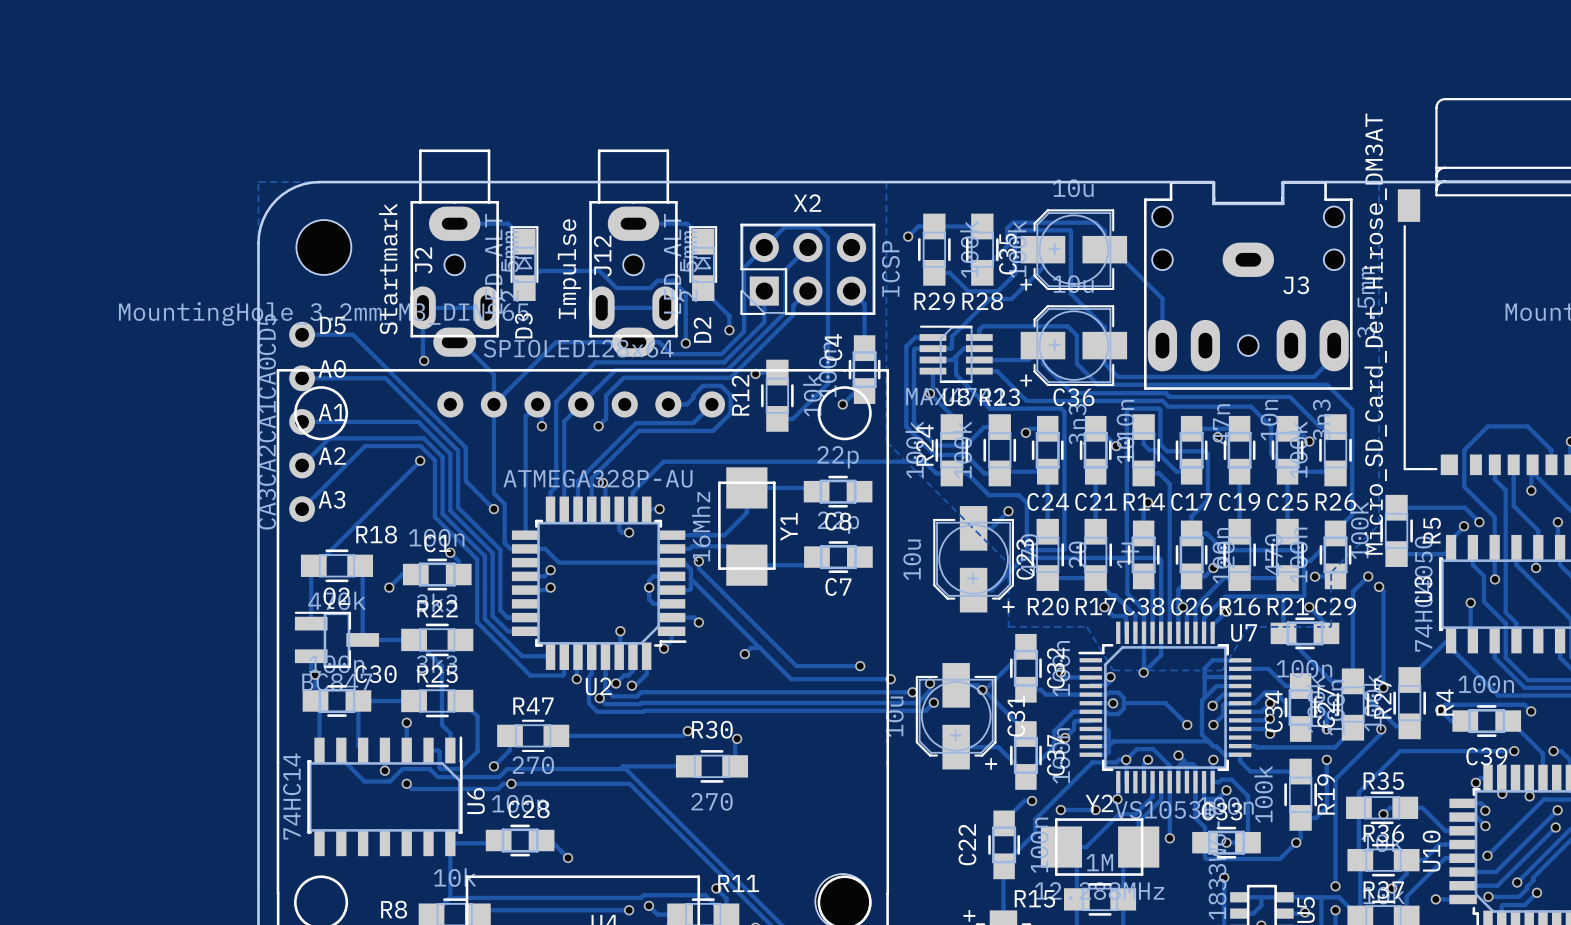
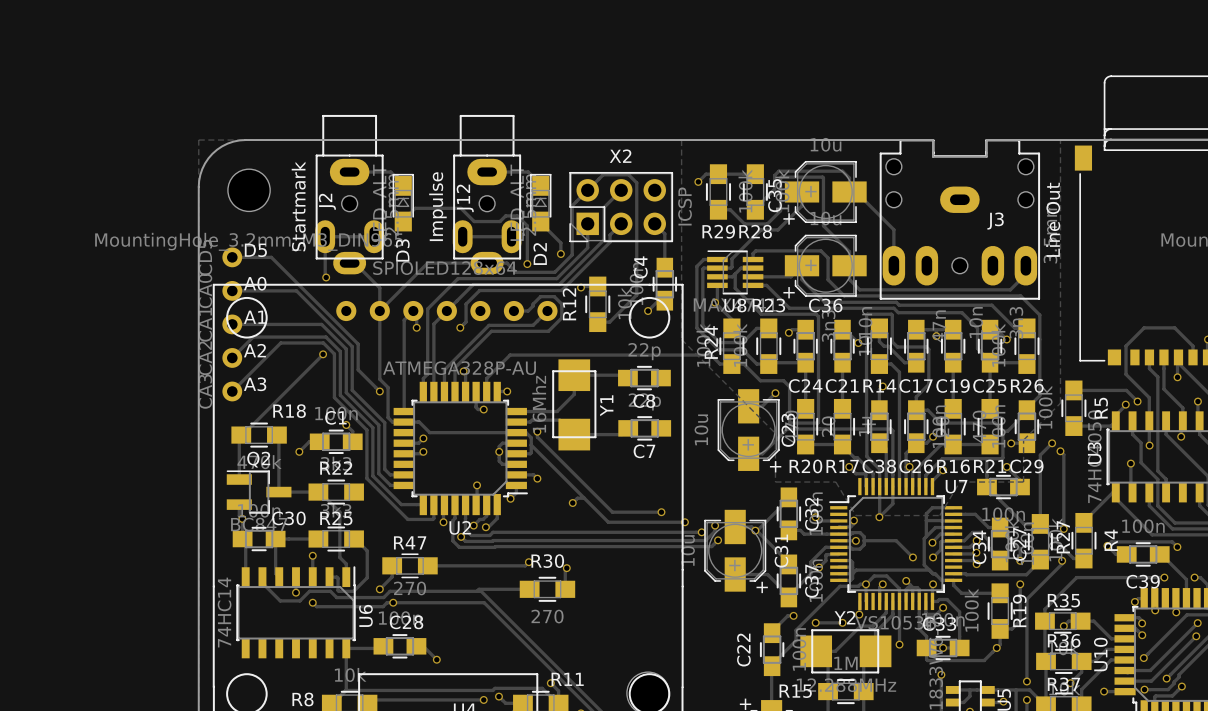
text: none -> Line Out (1053, 219)
part value: Micro_SD_Card_Det_Hirose_DM3AT (1375, 334) -> none

